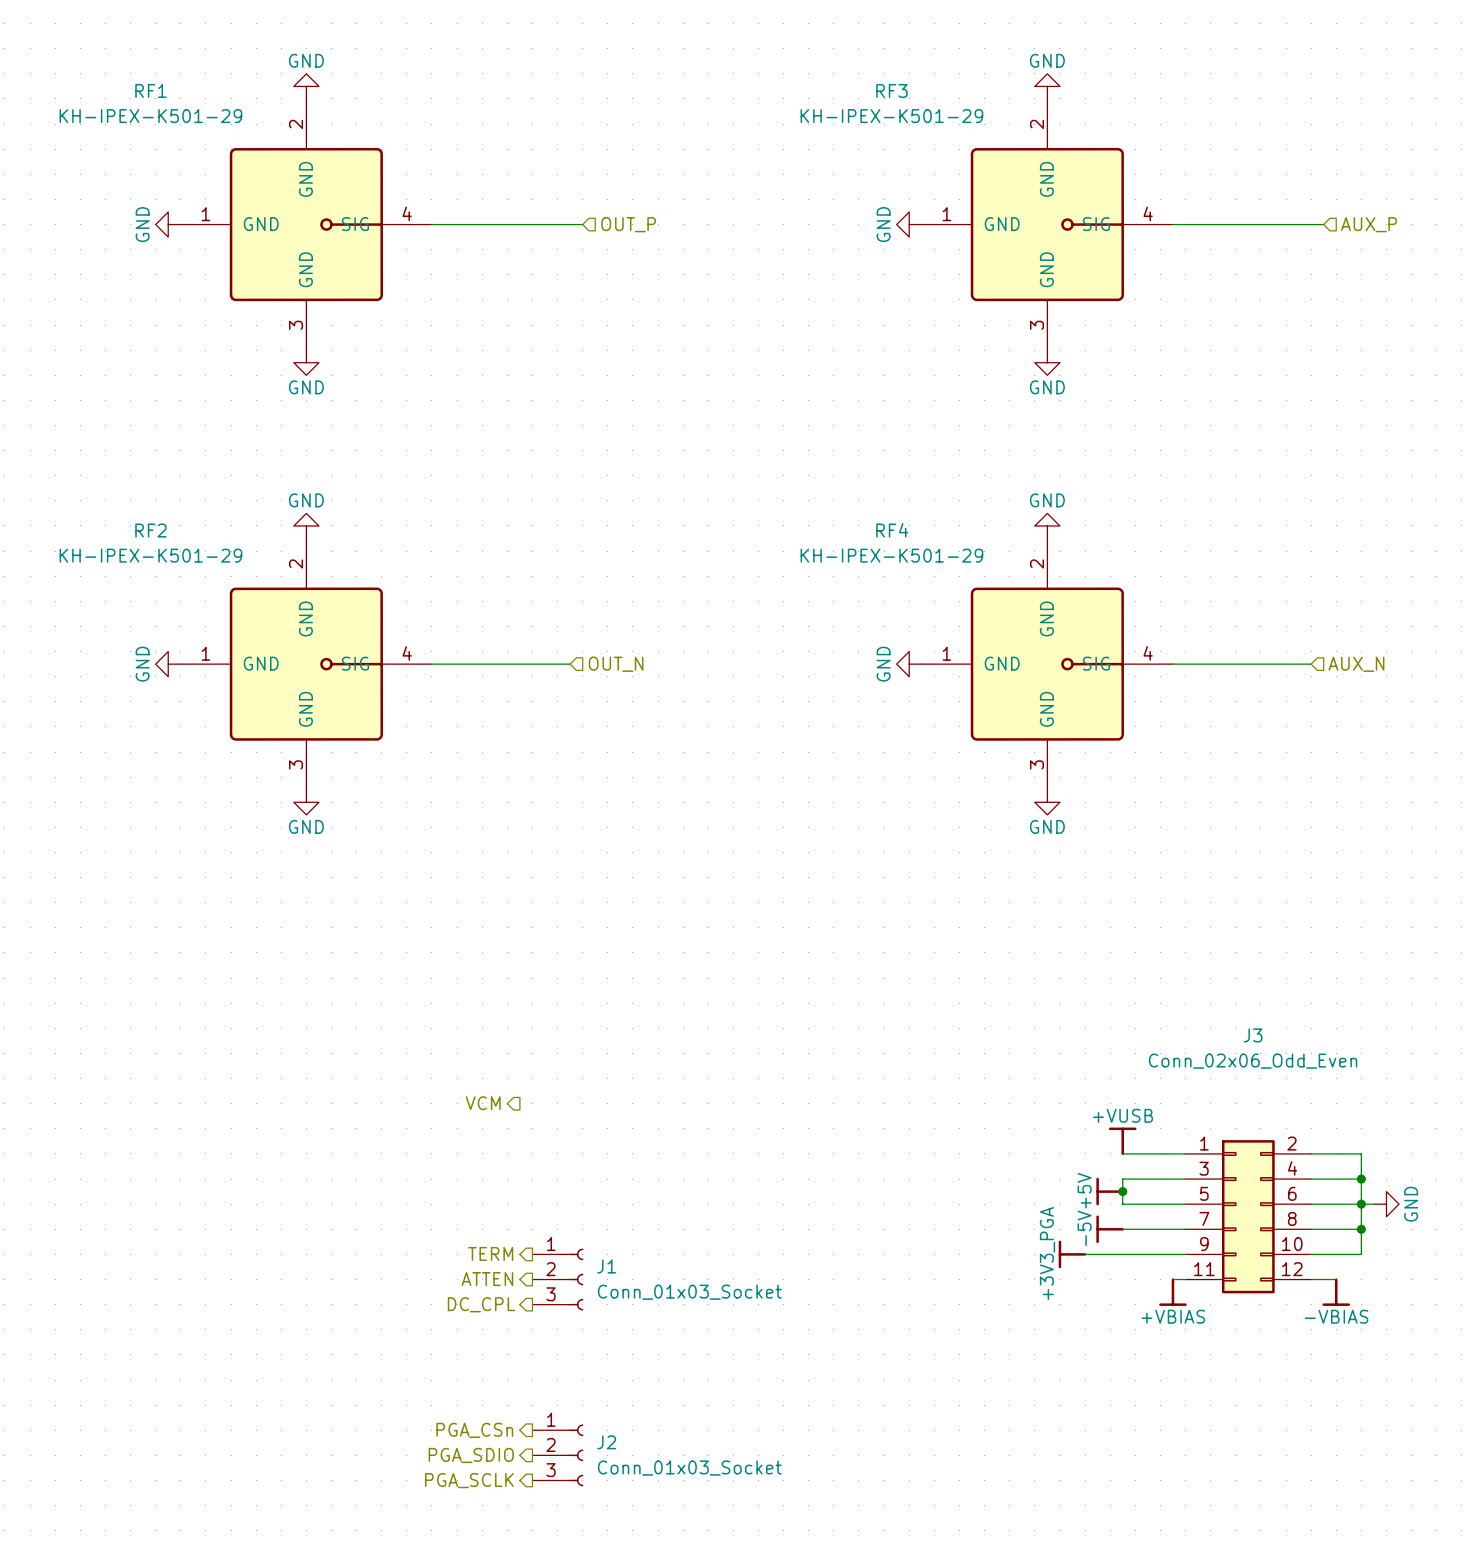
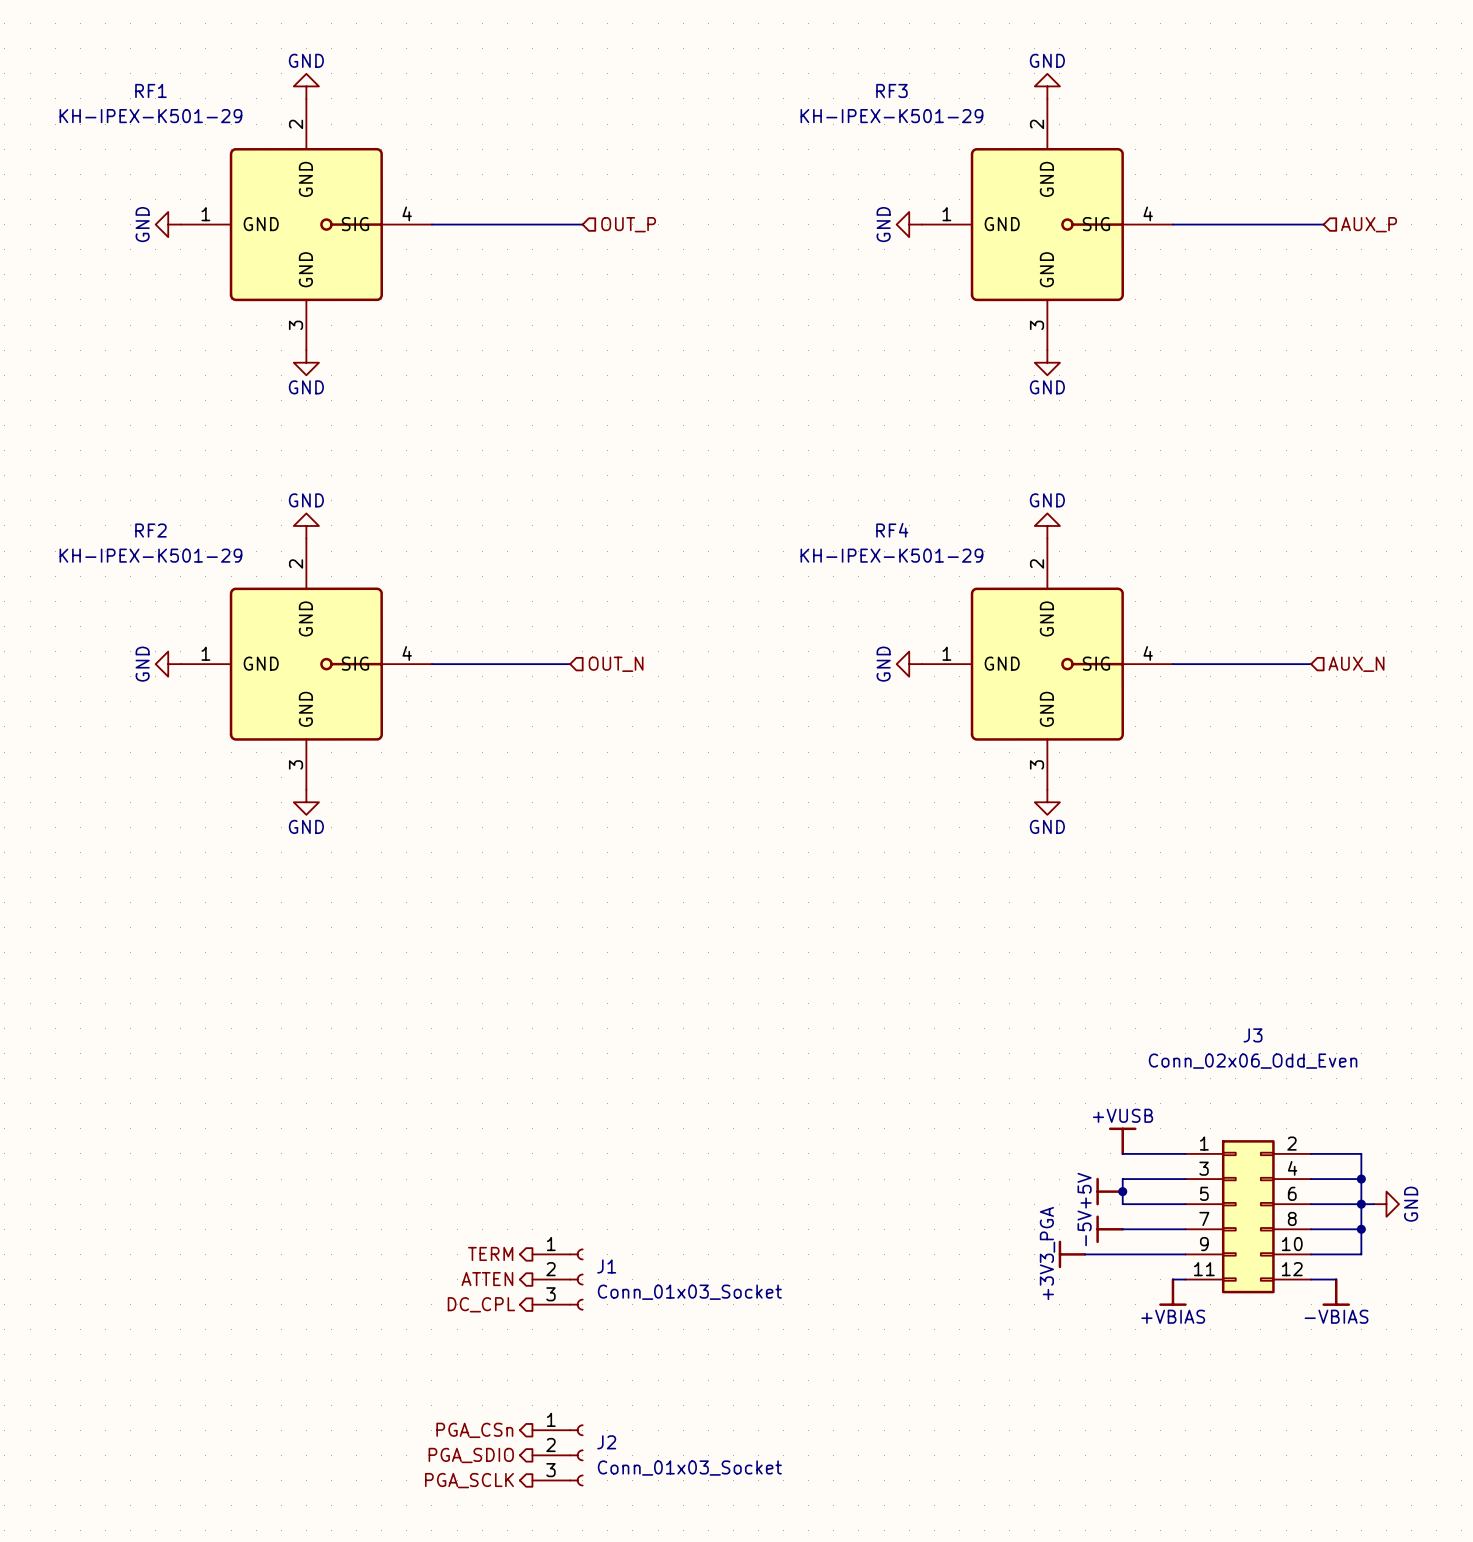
hierarchical label: VCM (483, 1103) -> none

